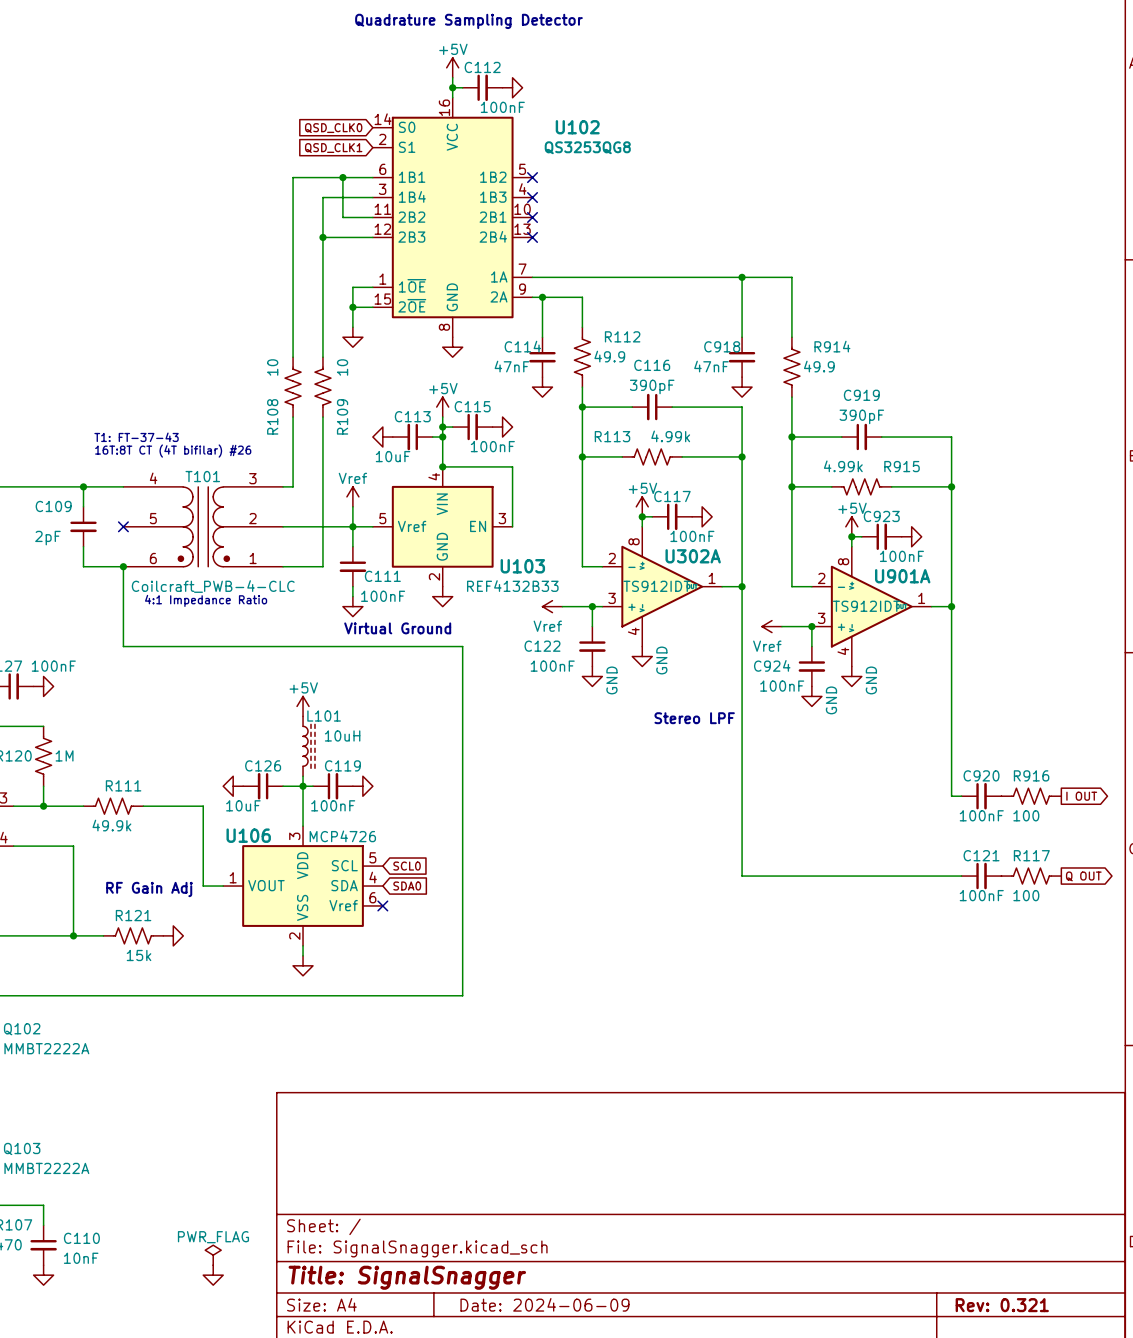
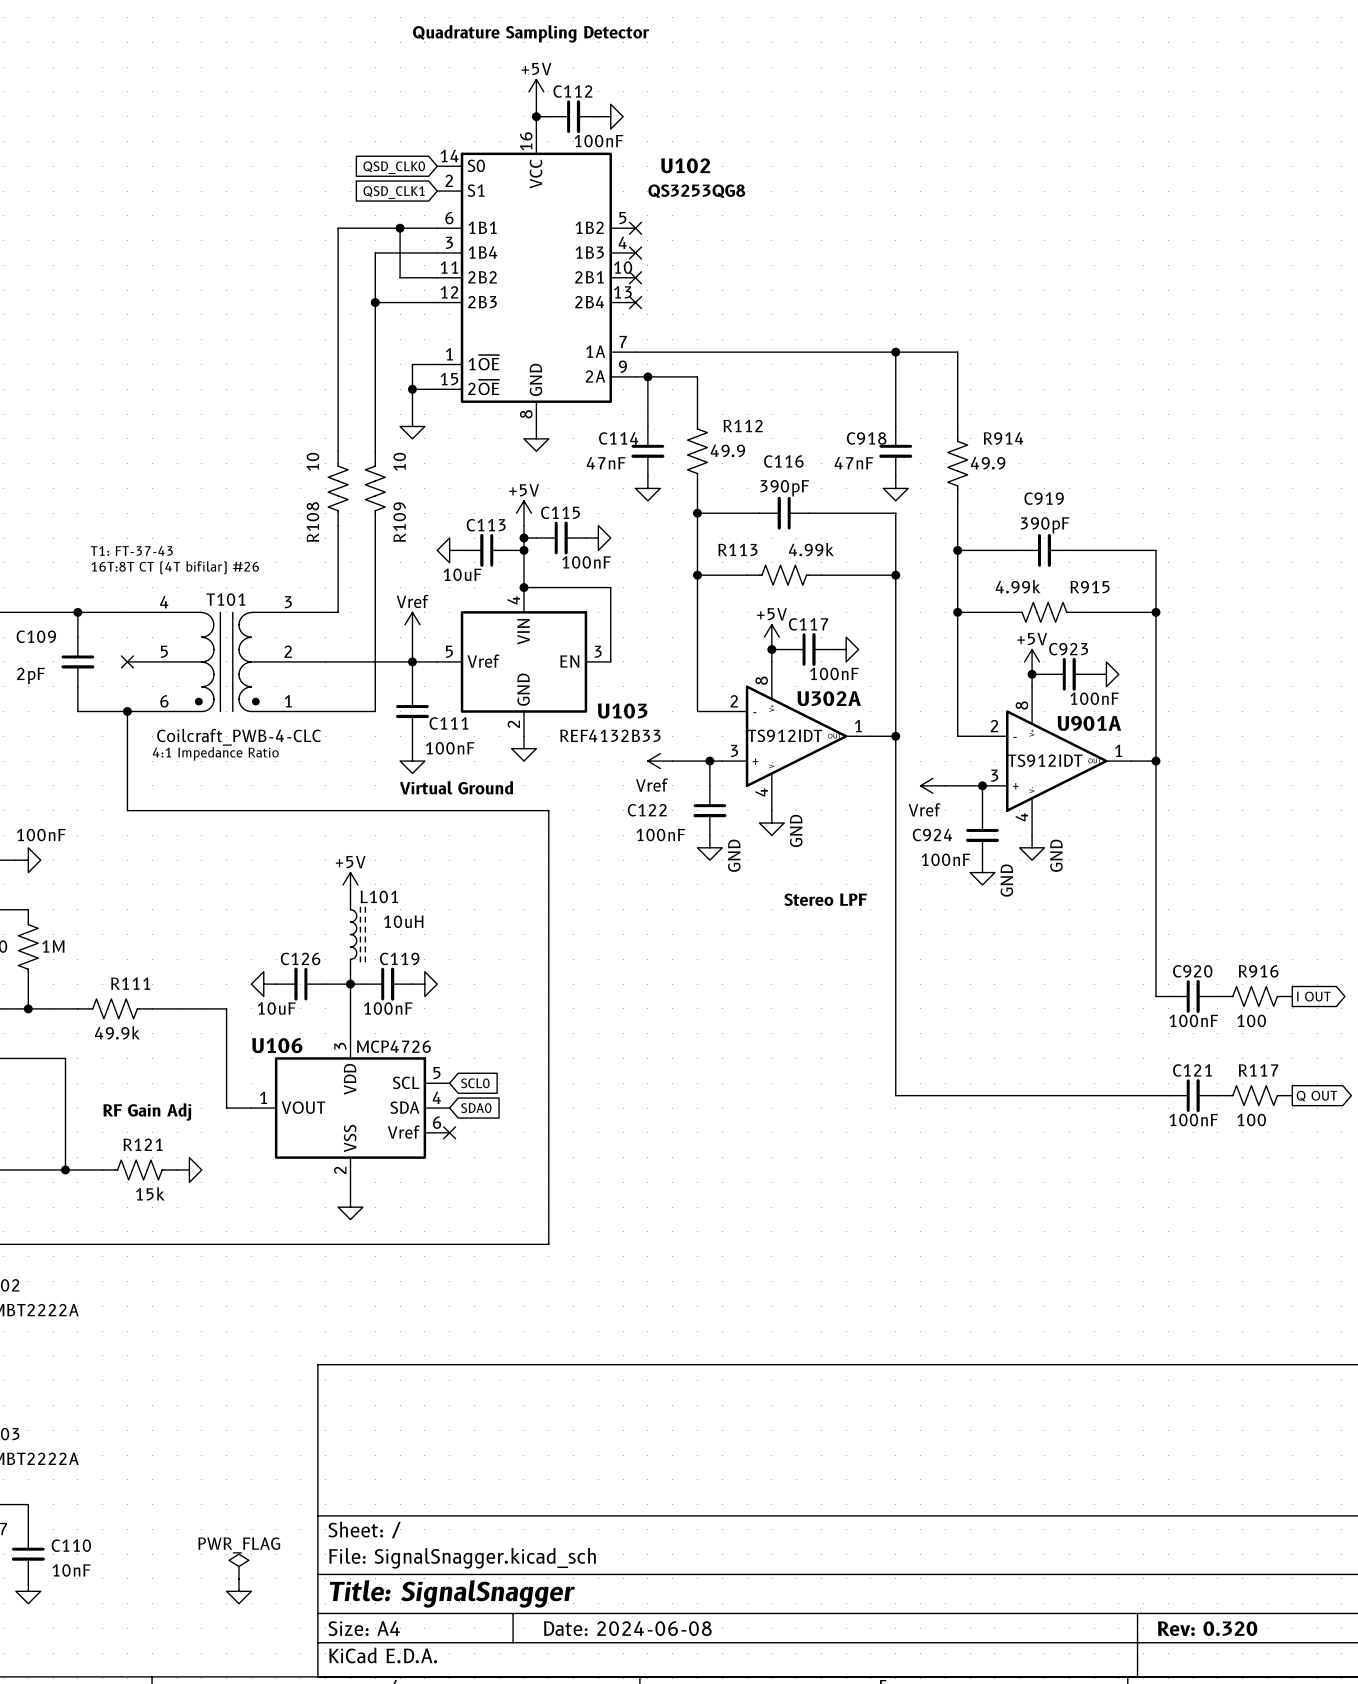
title block: Date: 2024-06-09 (544, 1304) -> Date: 2024-06-08 (627, 1628)
title block: Rev: 0.321 (1002, 1305) -> Rev: 0.320 (1207, 1628)

